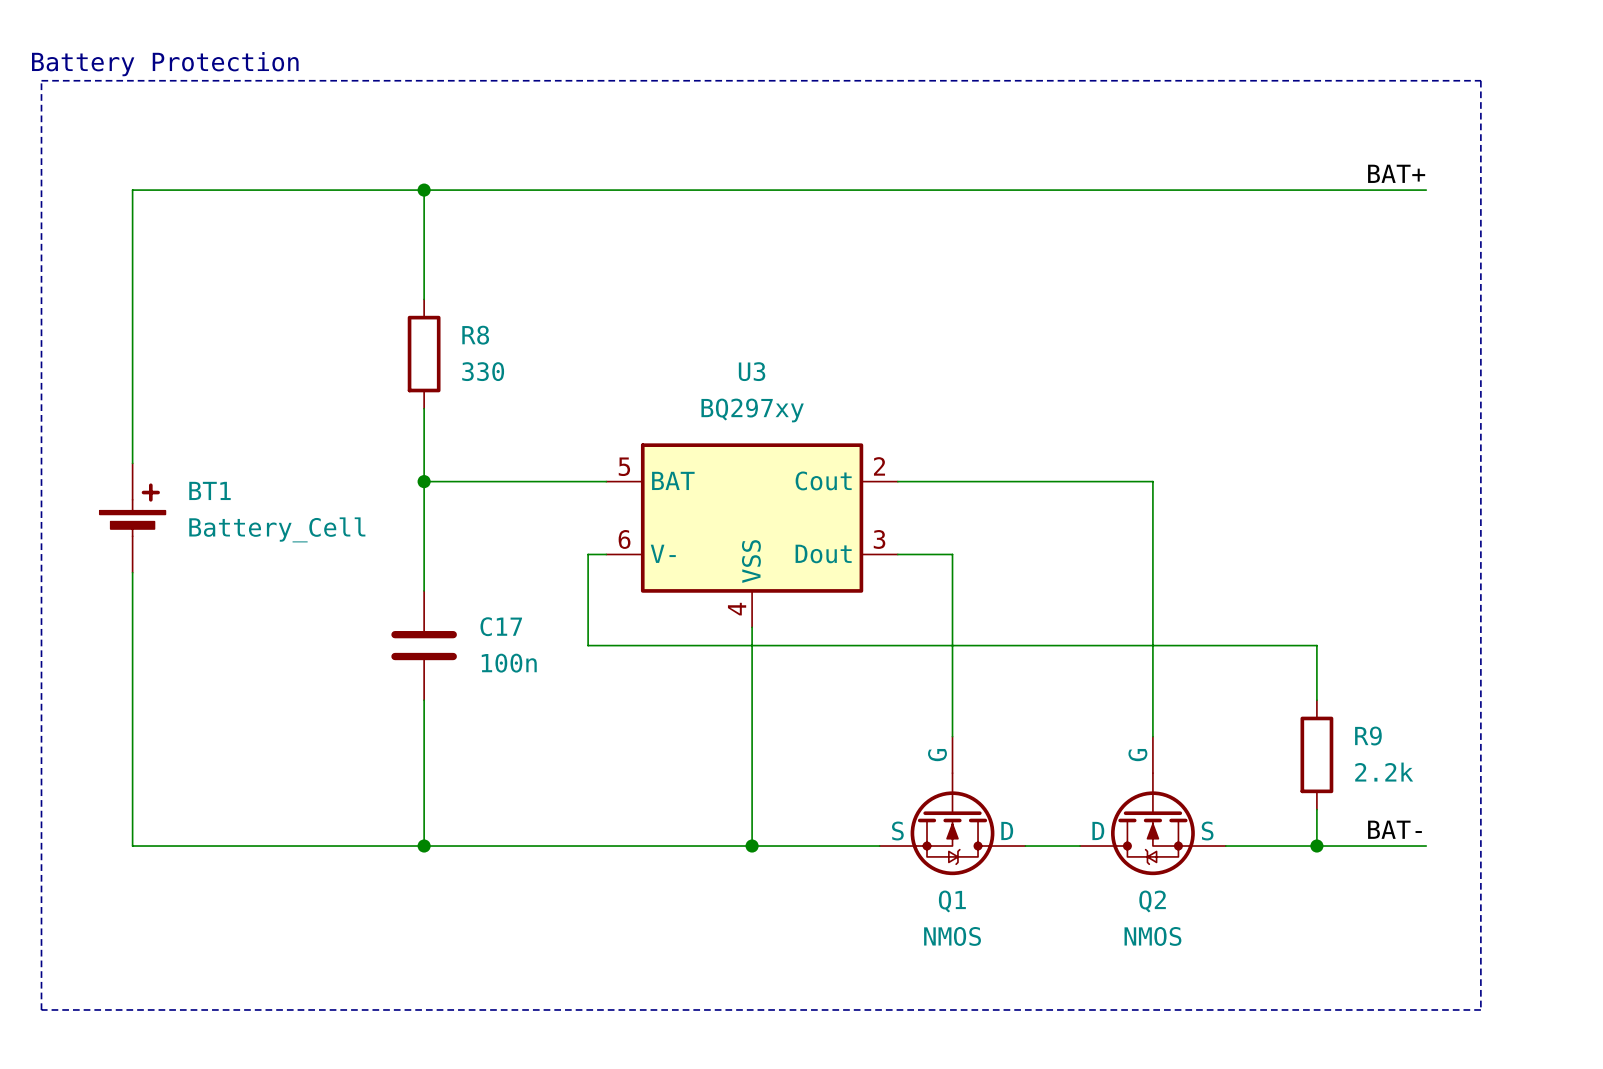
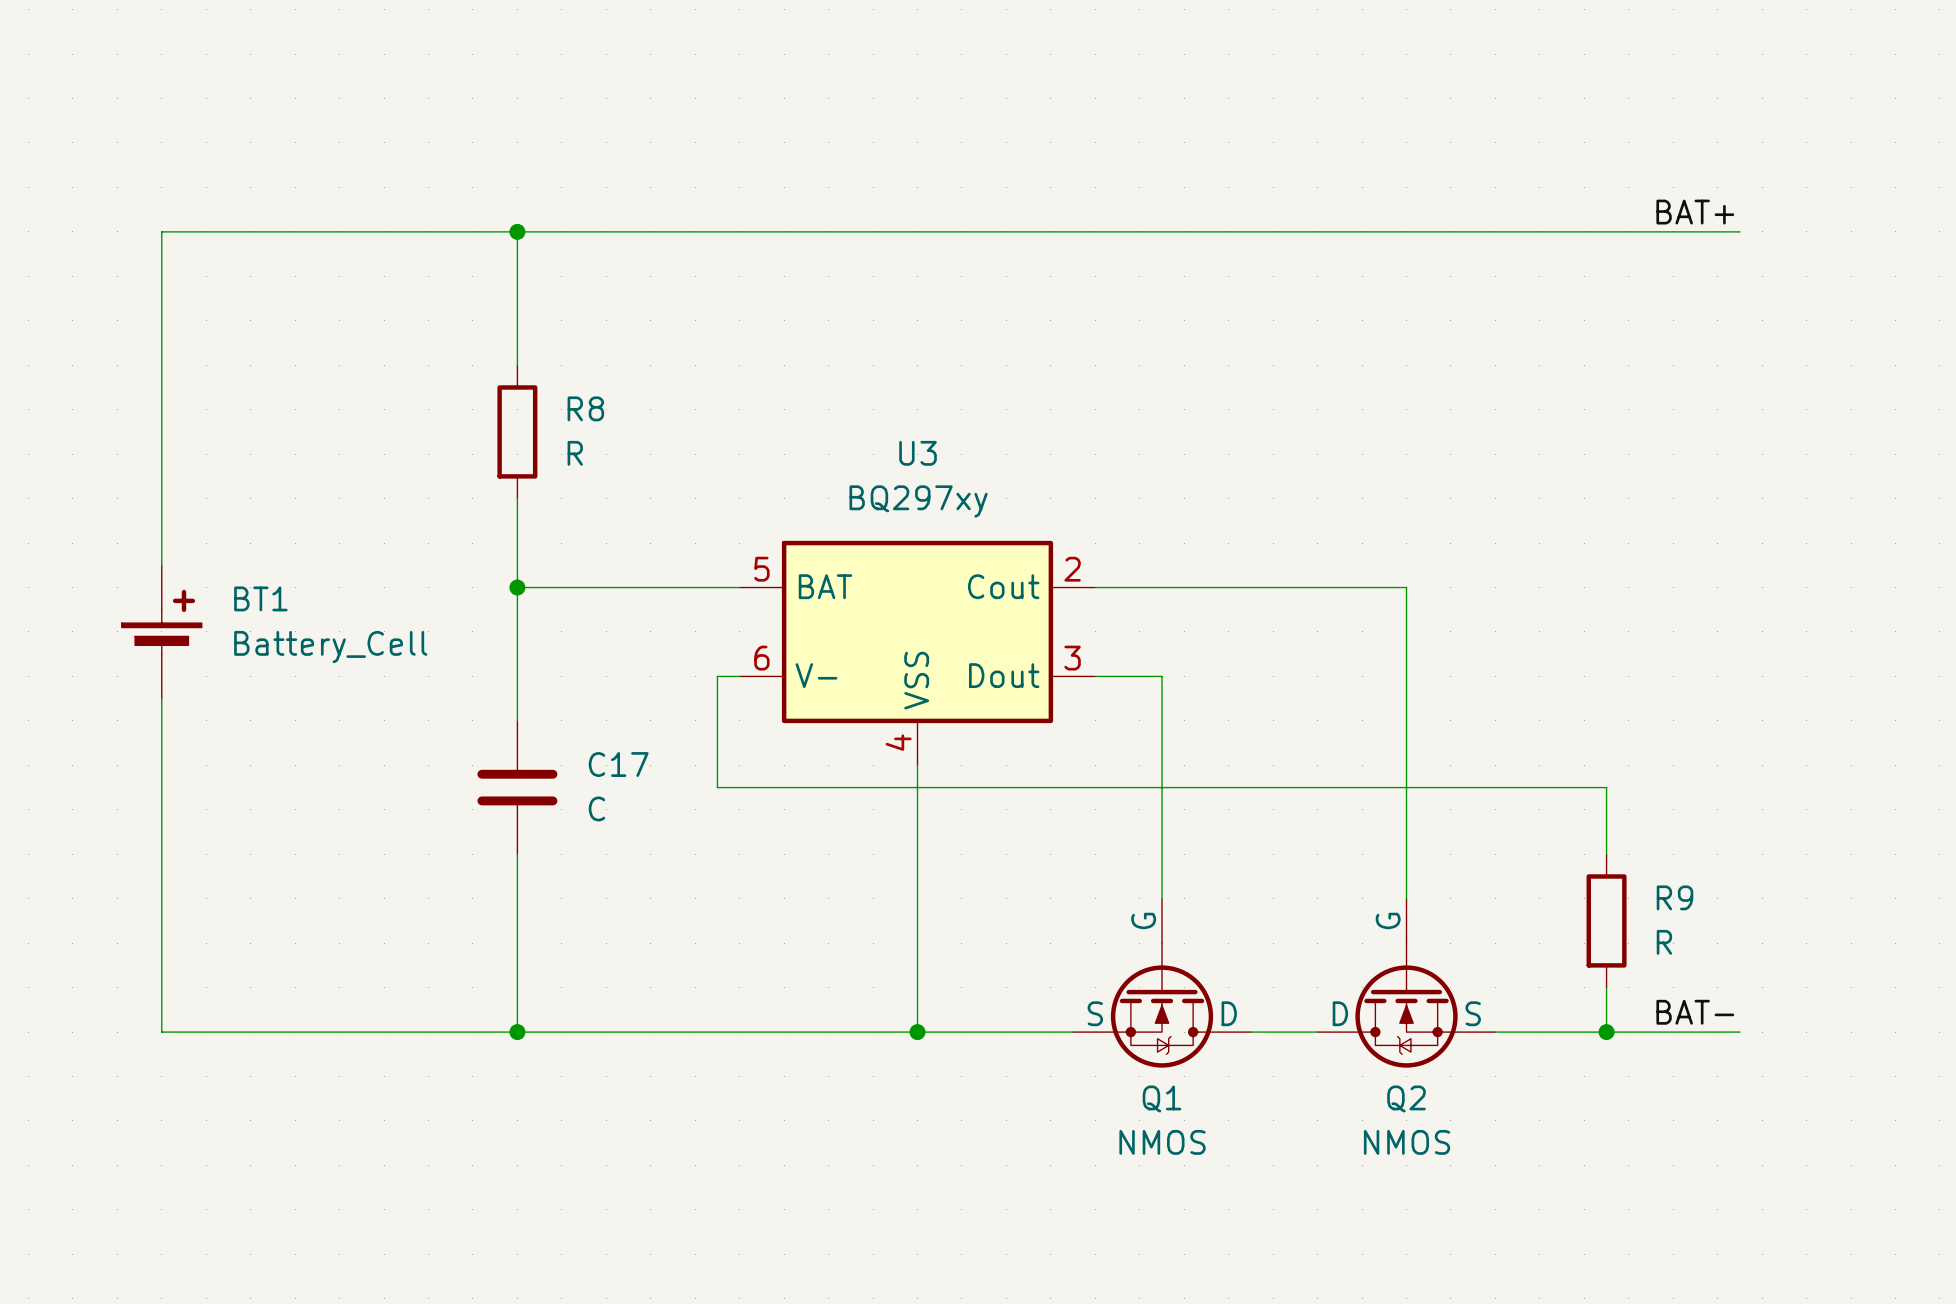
text: Battery Protection (165, 64) -> none
line: (41, 80) (1480, 80) (1480, 1009) (41, 1009) (41, 80) -> none
R8 value: 330 (483, 371) -> R (575, 453)
C17 value: 100n (509, 663) -> C (596, 808)
R9 value: 2.2k (1384, 772) -> R (1664, 942)

